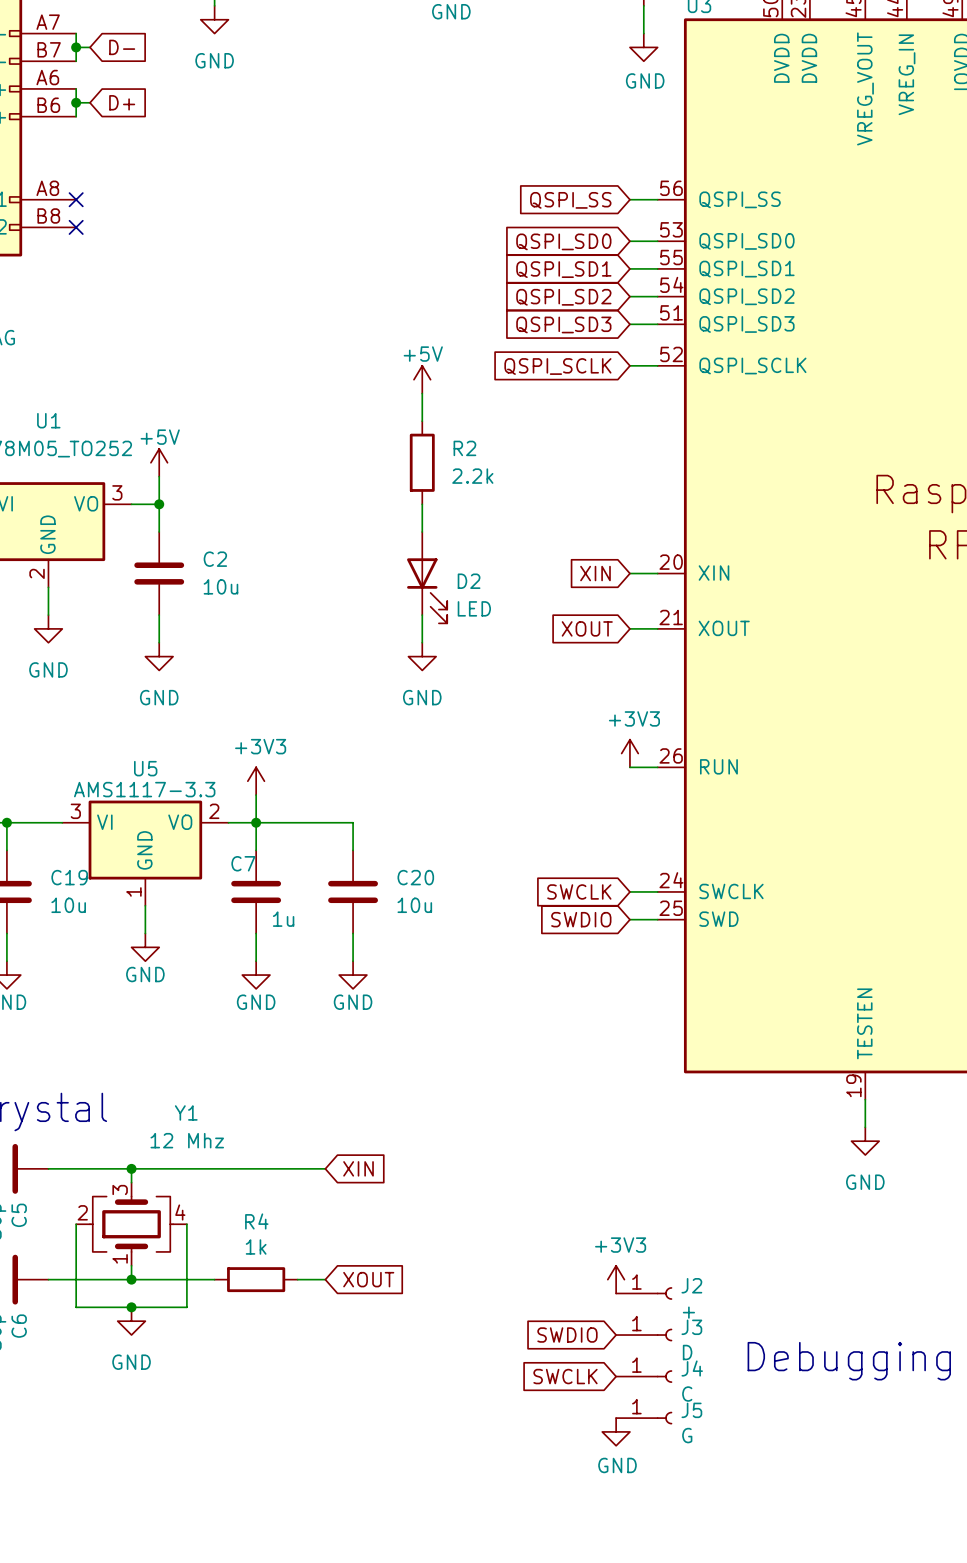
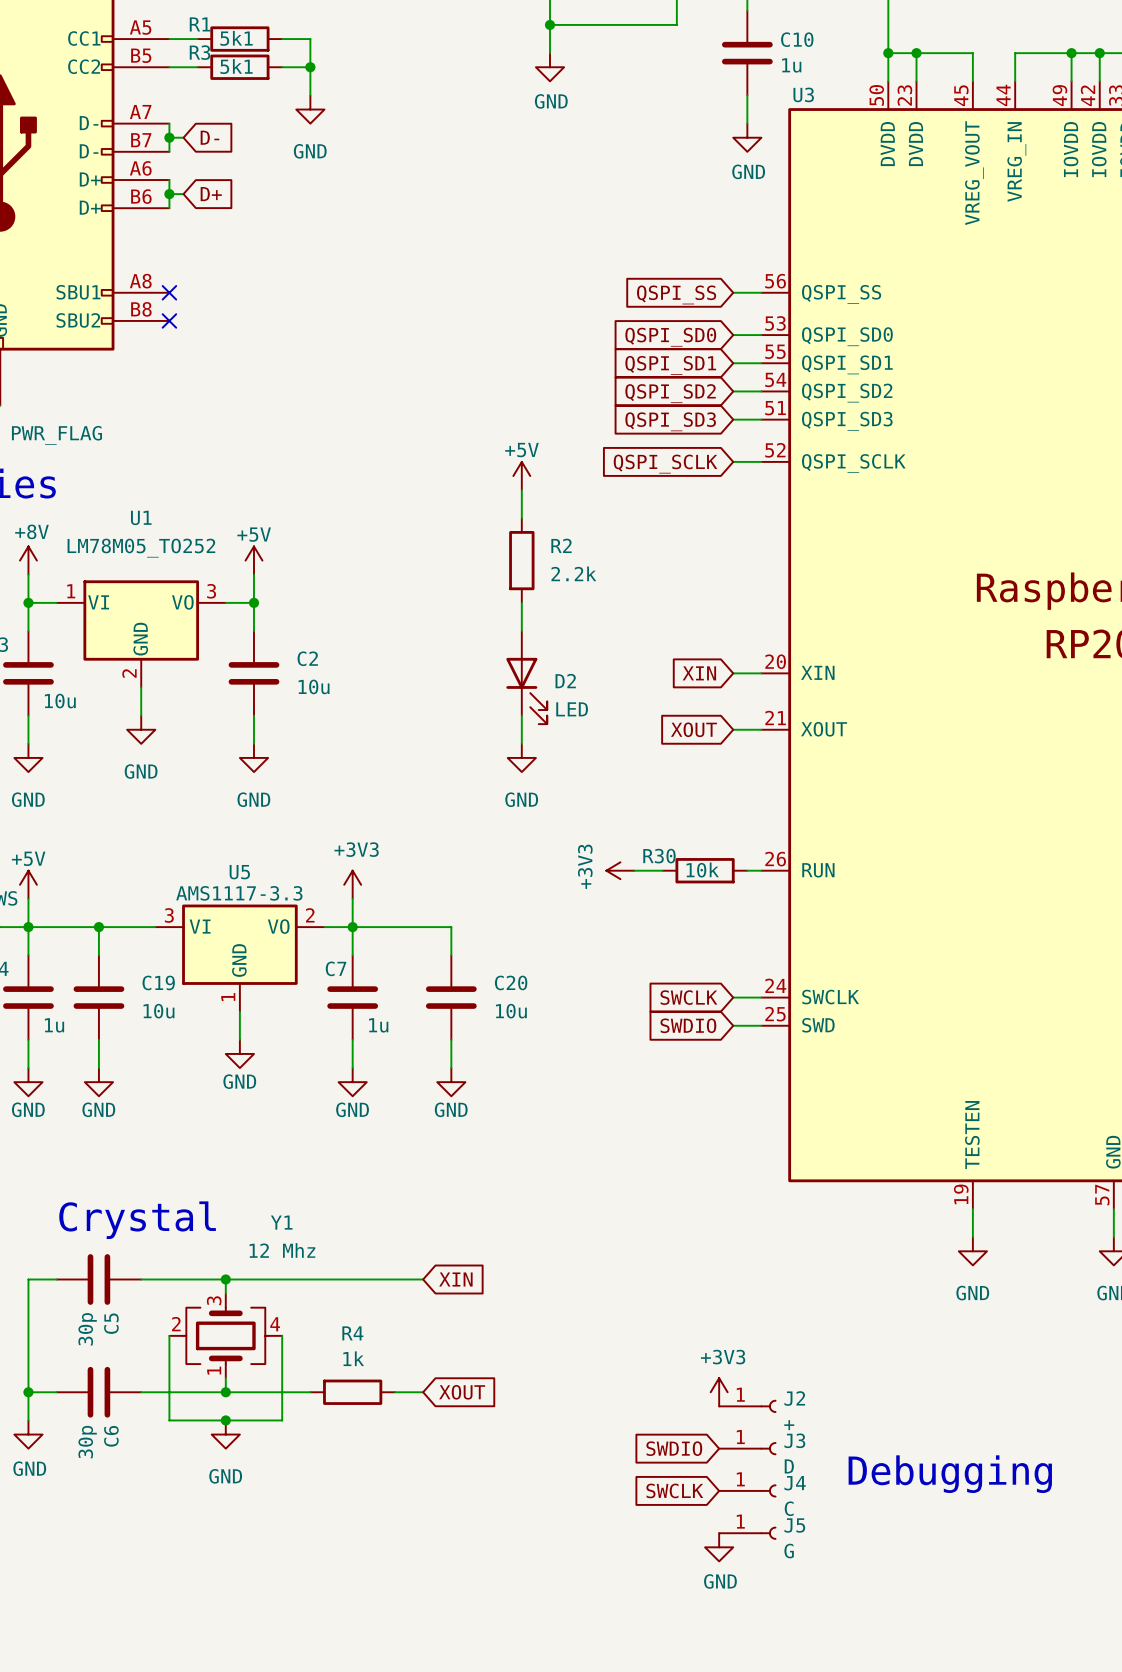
power symbol rotation: 0° (629, 753) -> 90° counterclockwise (620, 870)
power symbol position: +3V3 (629, 753) -> +3V3 (620, 870)
wire: none -> (634, 870) (662, 870)
R30: none -> 10k (705, 870)

